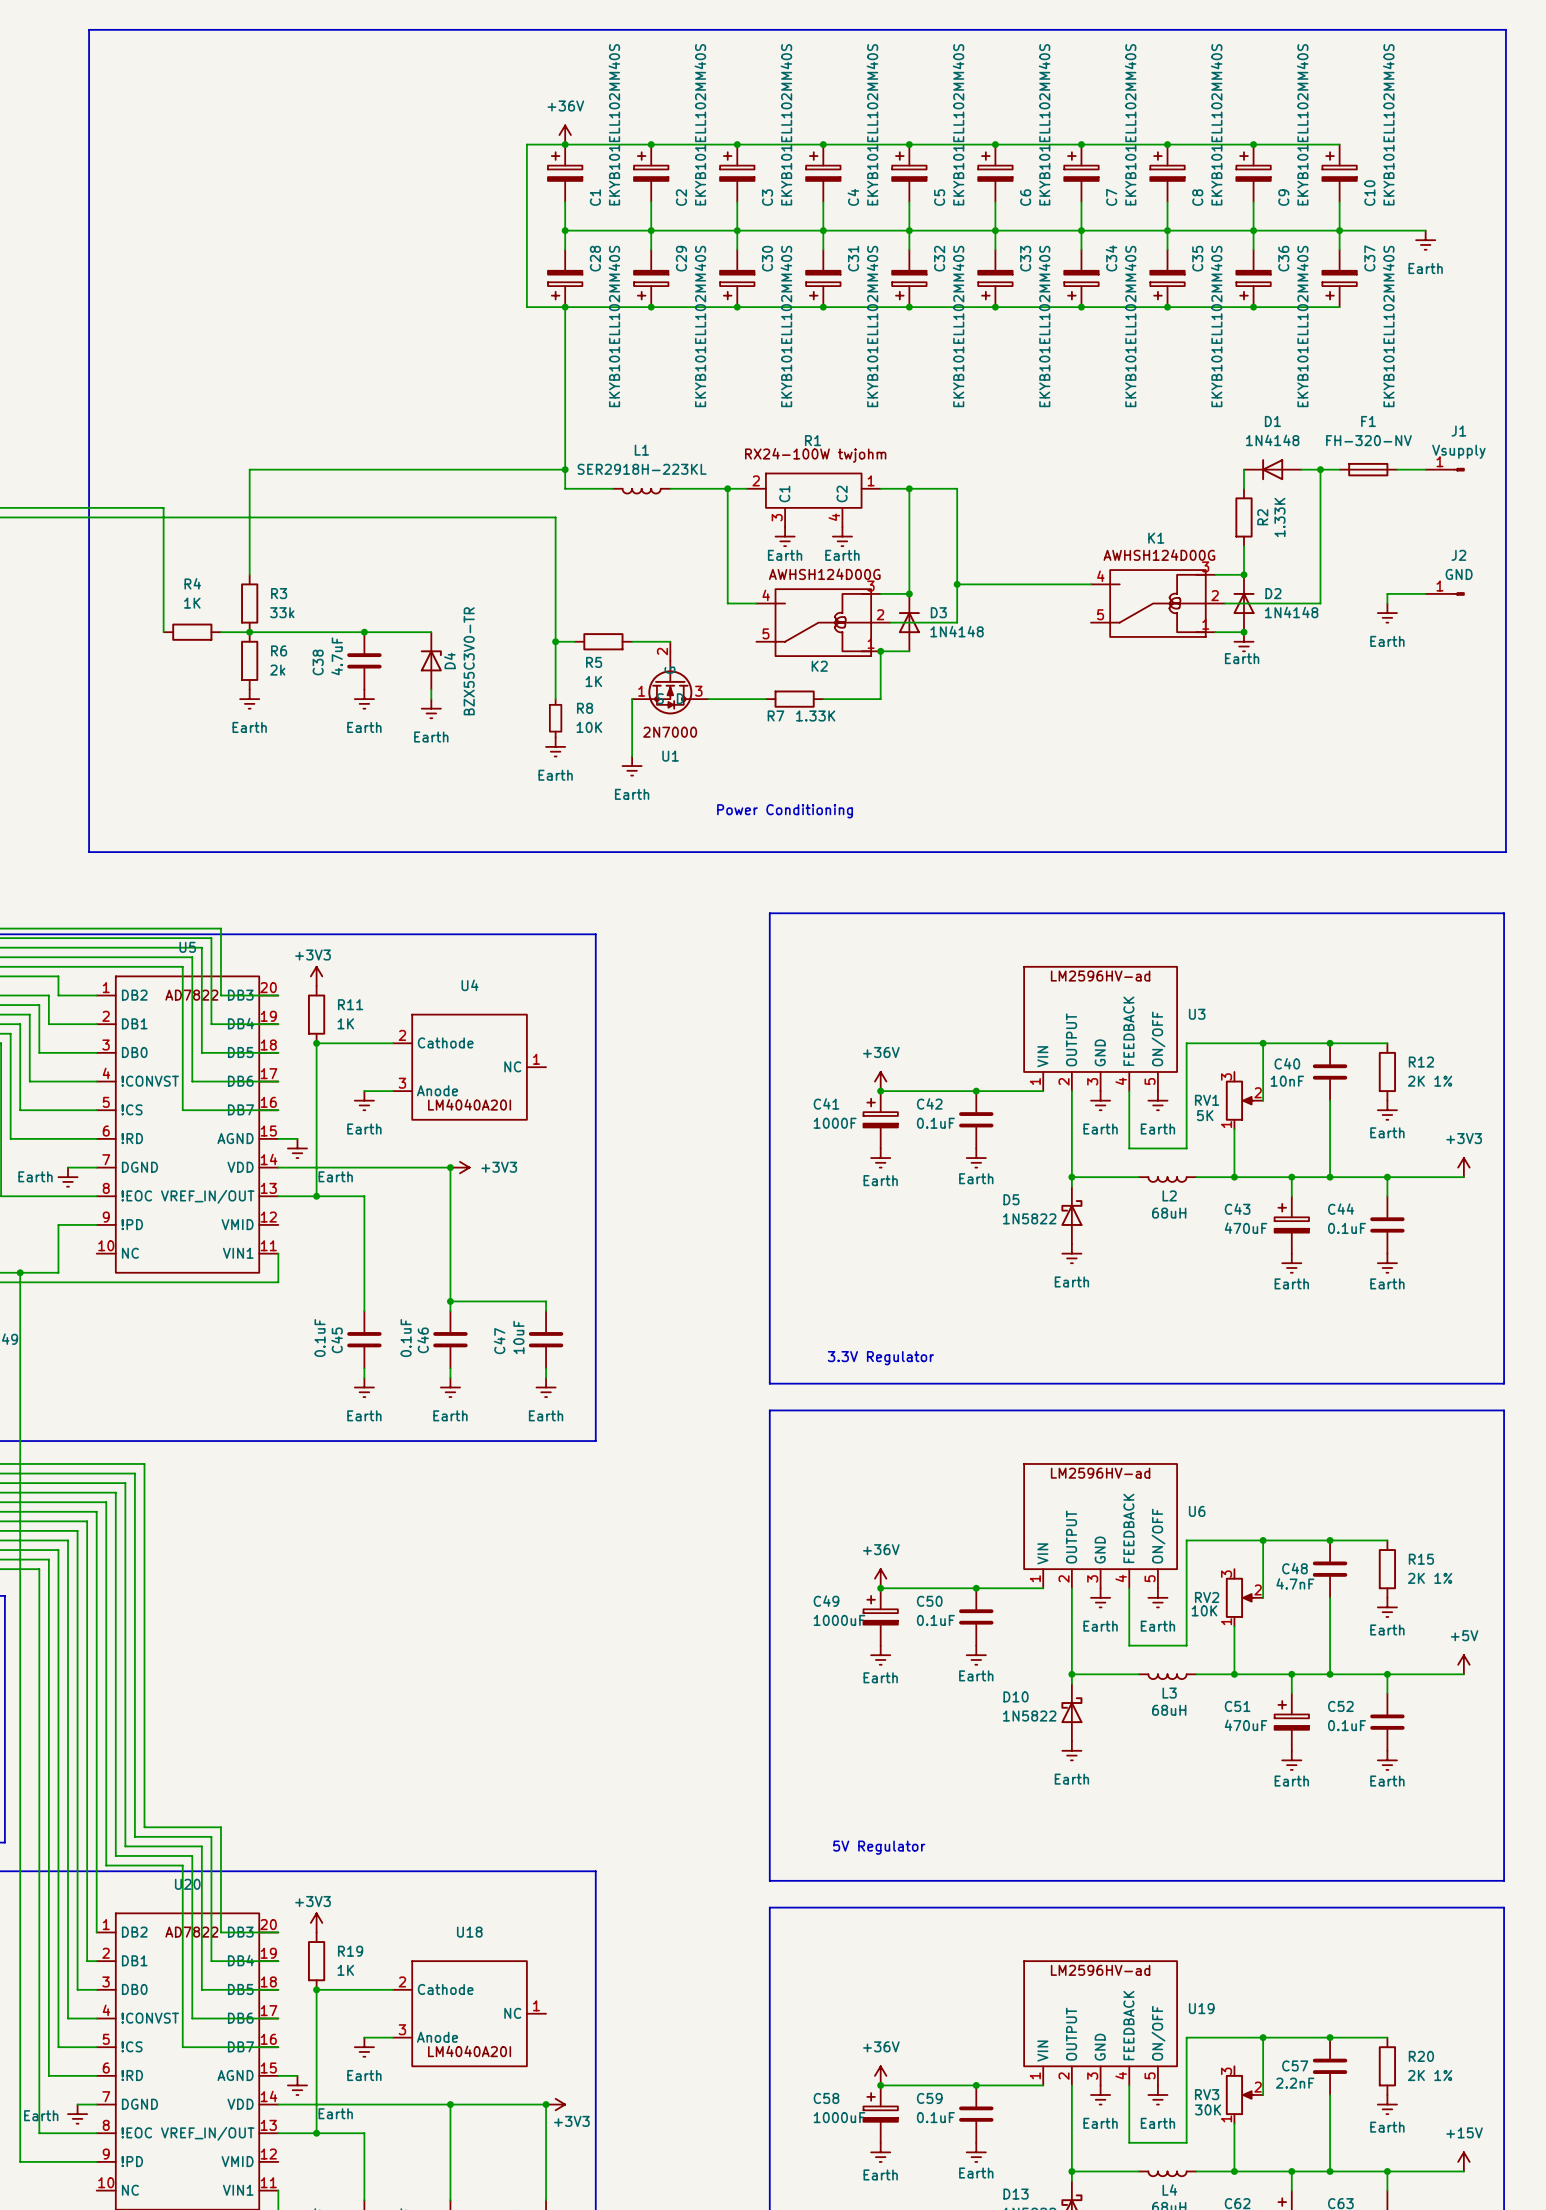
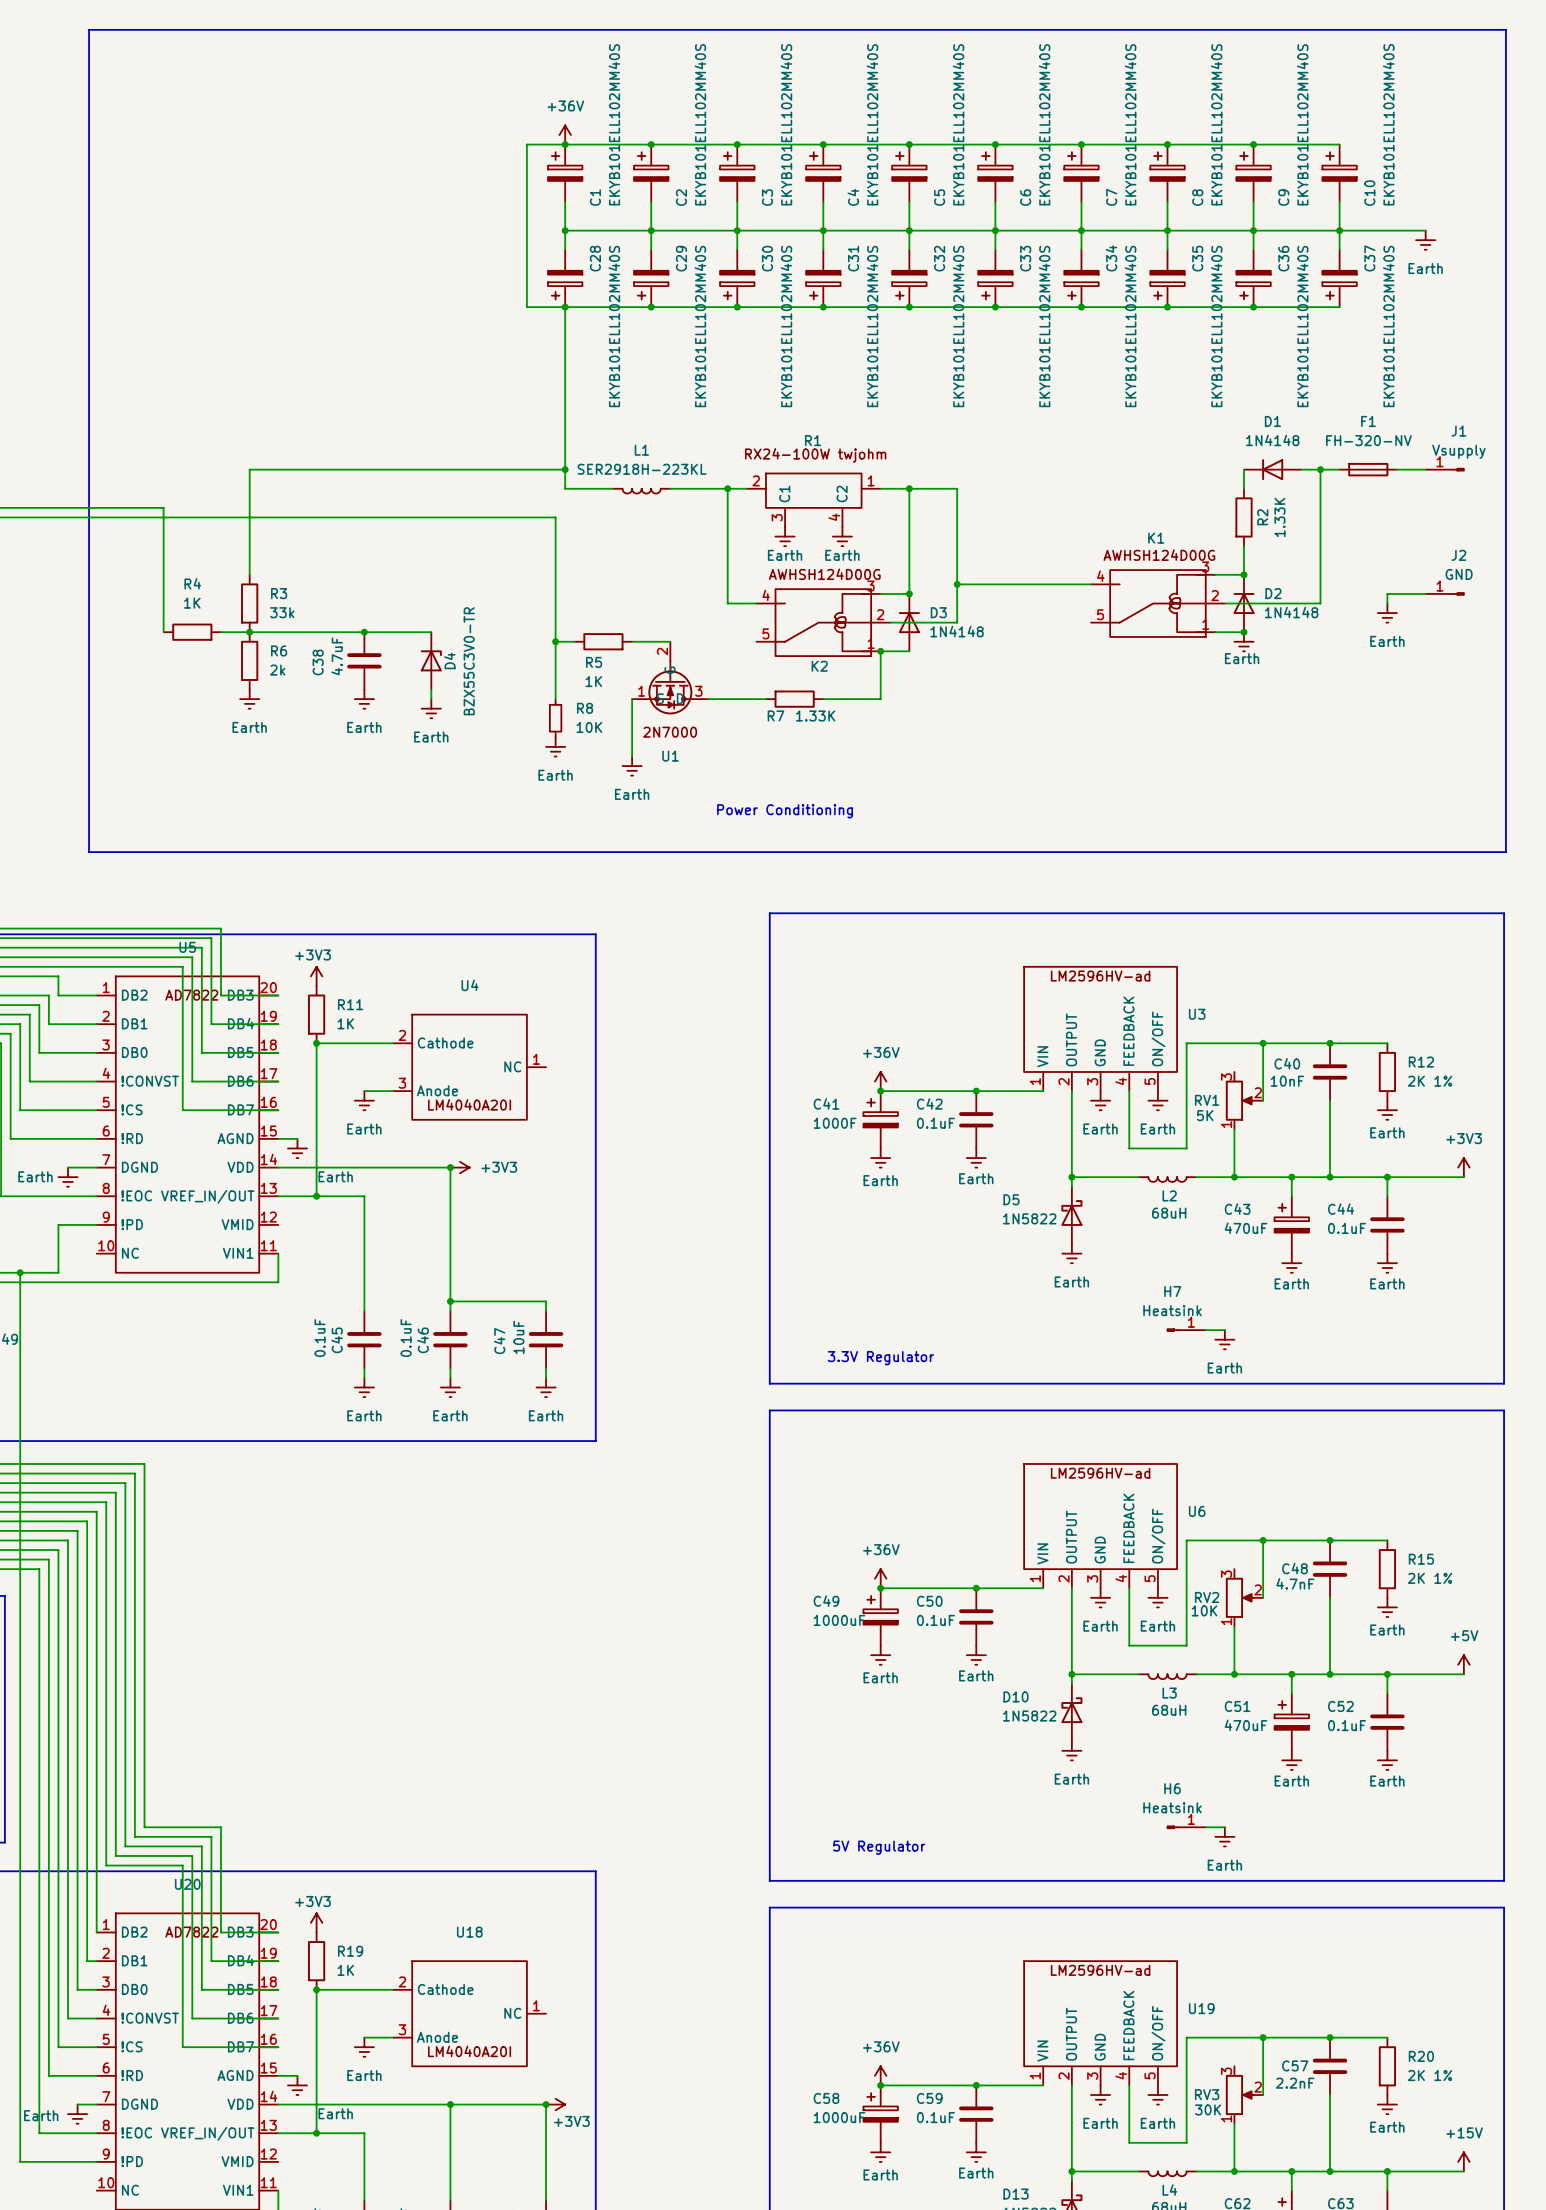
H7: none -> Heatsink (1186, 1330)
wire: none -> (1205, 1330) (1224, 1330)
power symbol: none -> Earth (1224, 1339)
H6: none -> Heatsink (1186, 1827)
wire: none -> (1205, 1827) (1224, 1827)
power symbol: none -> Earth (1224, 1836)

